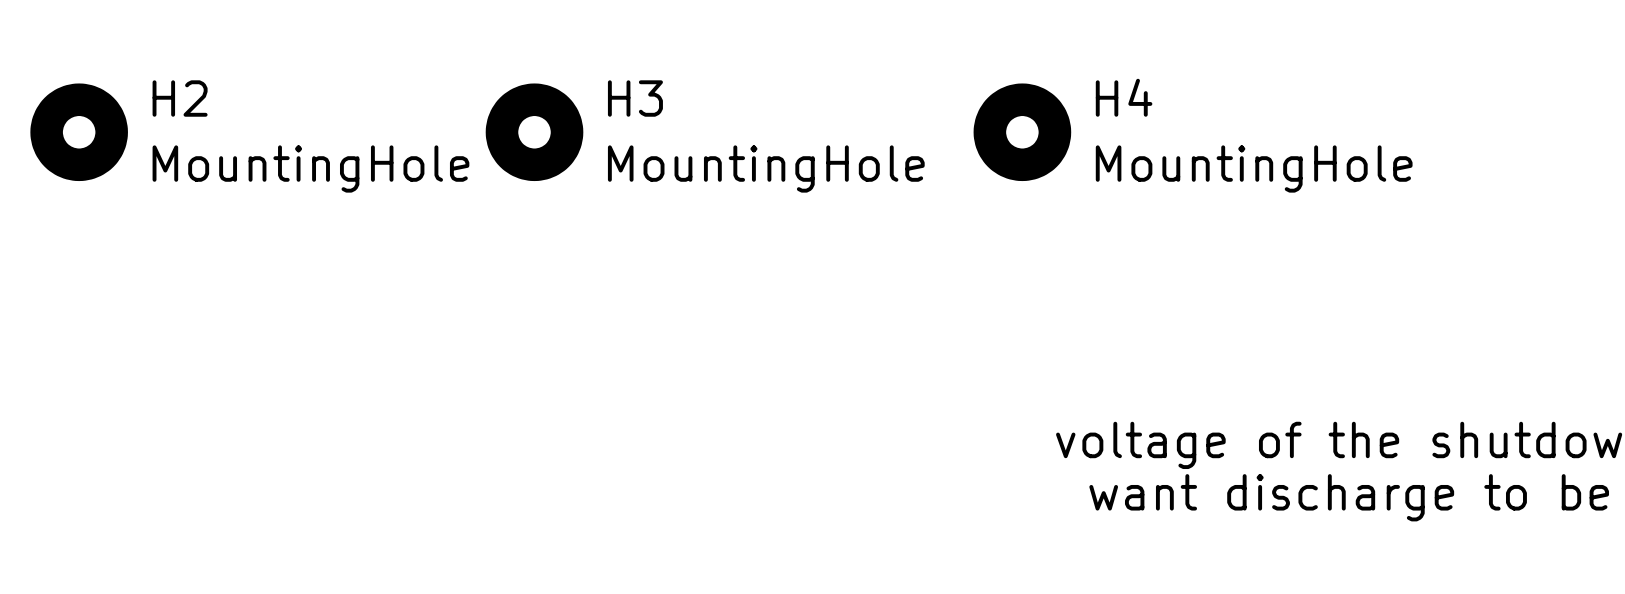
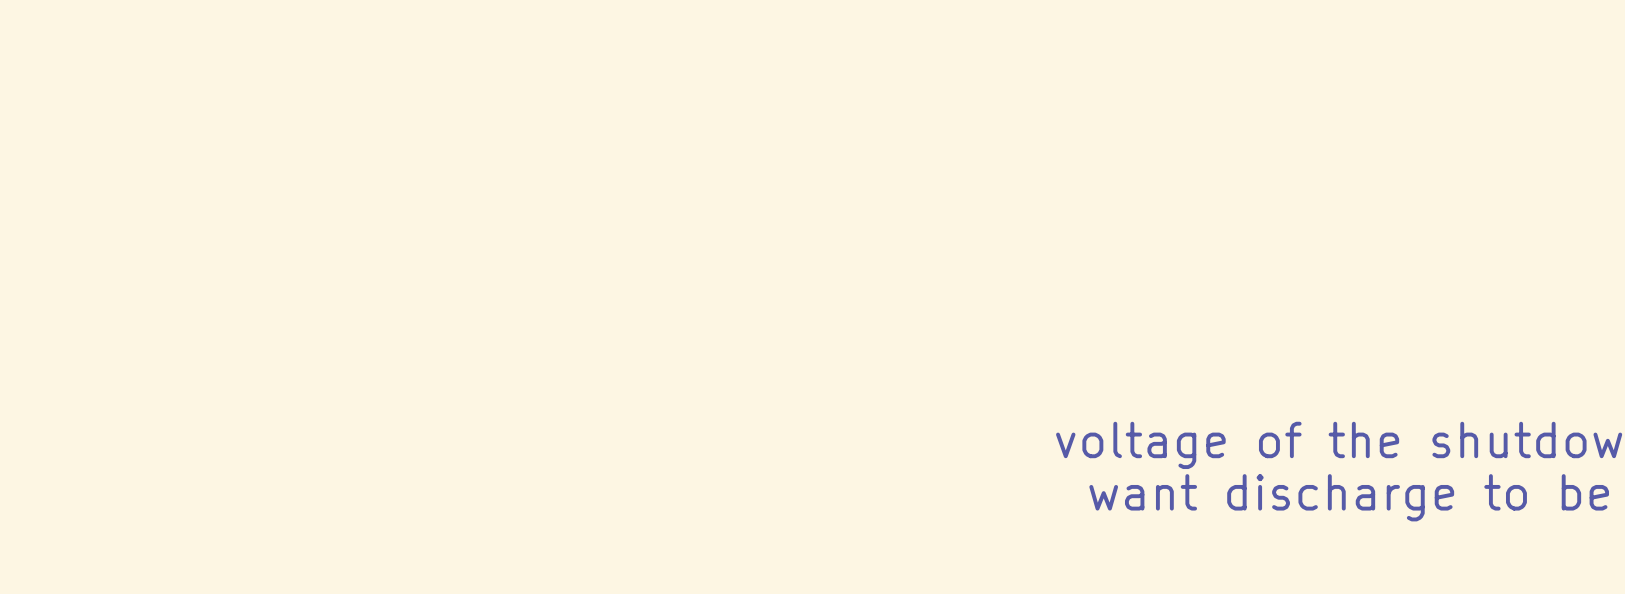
H2: MountingHole (79, 132) -> none
H3: MountingHole (534, 132) -> none
H4: MountingHole (1022, 132) -> none

